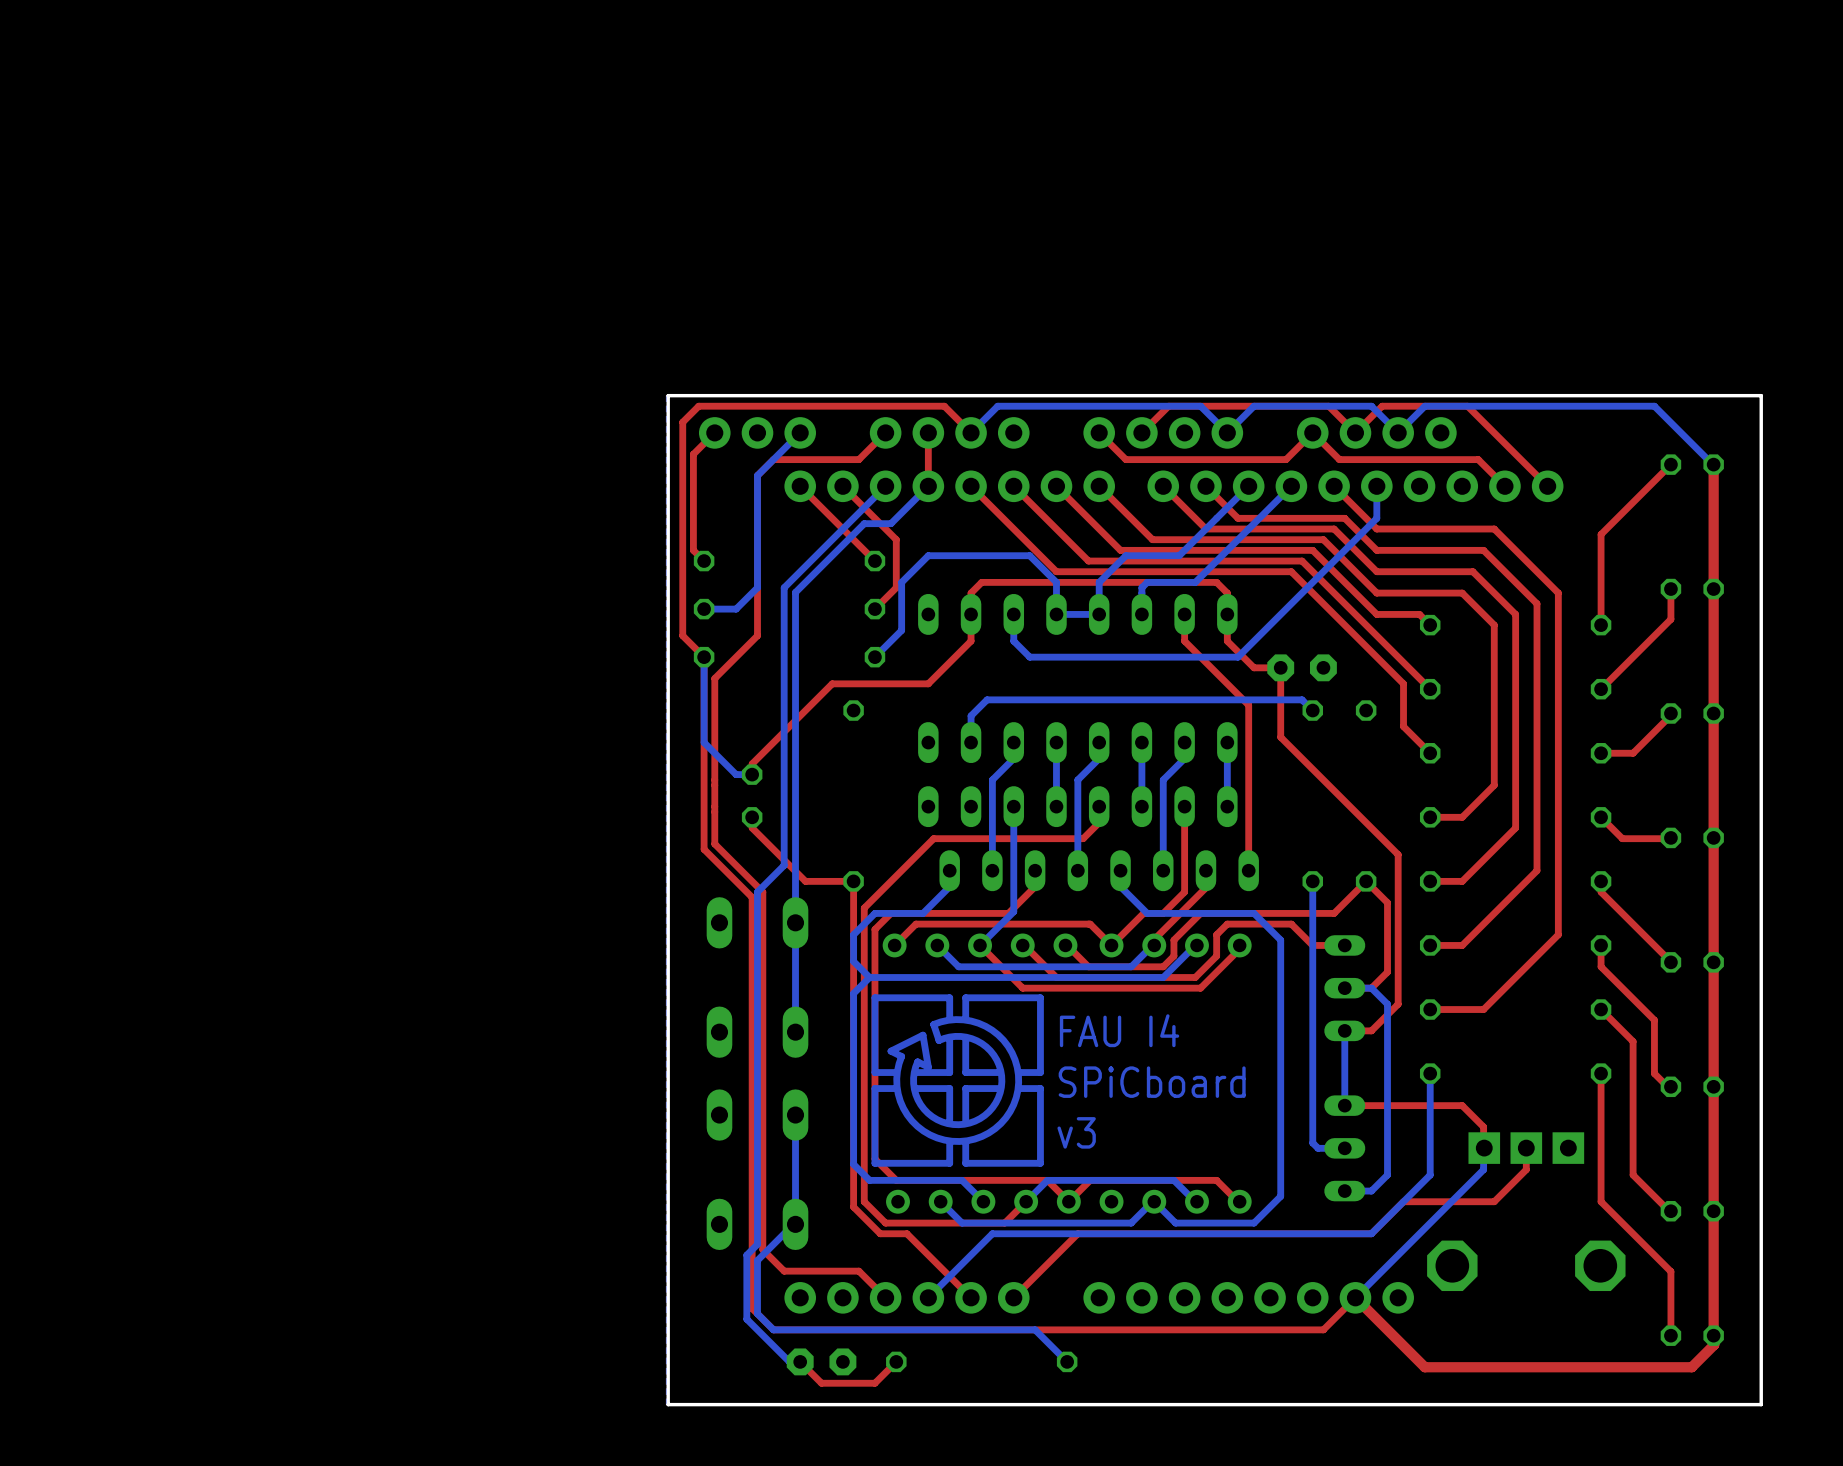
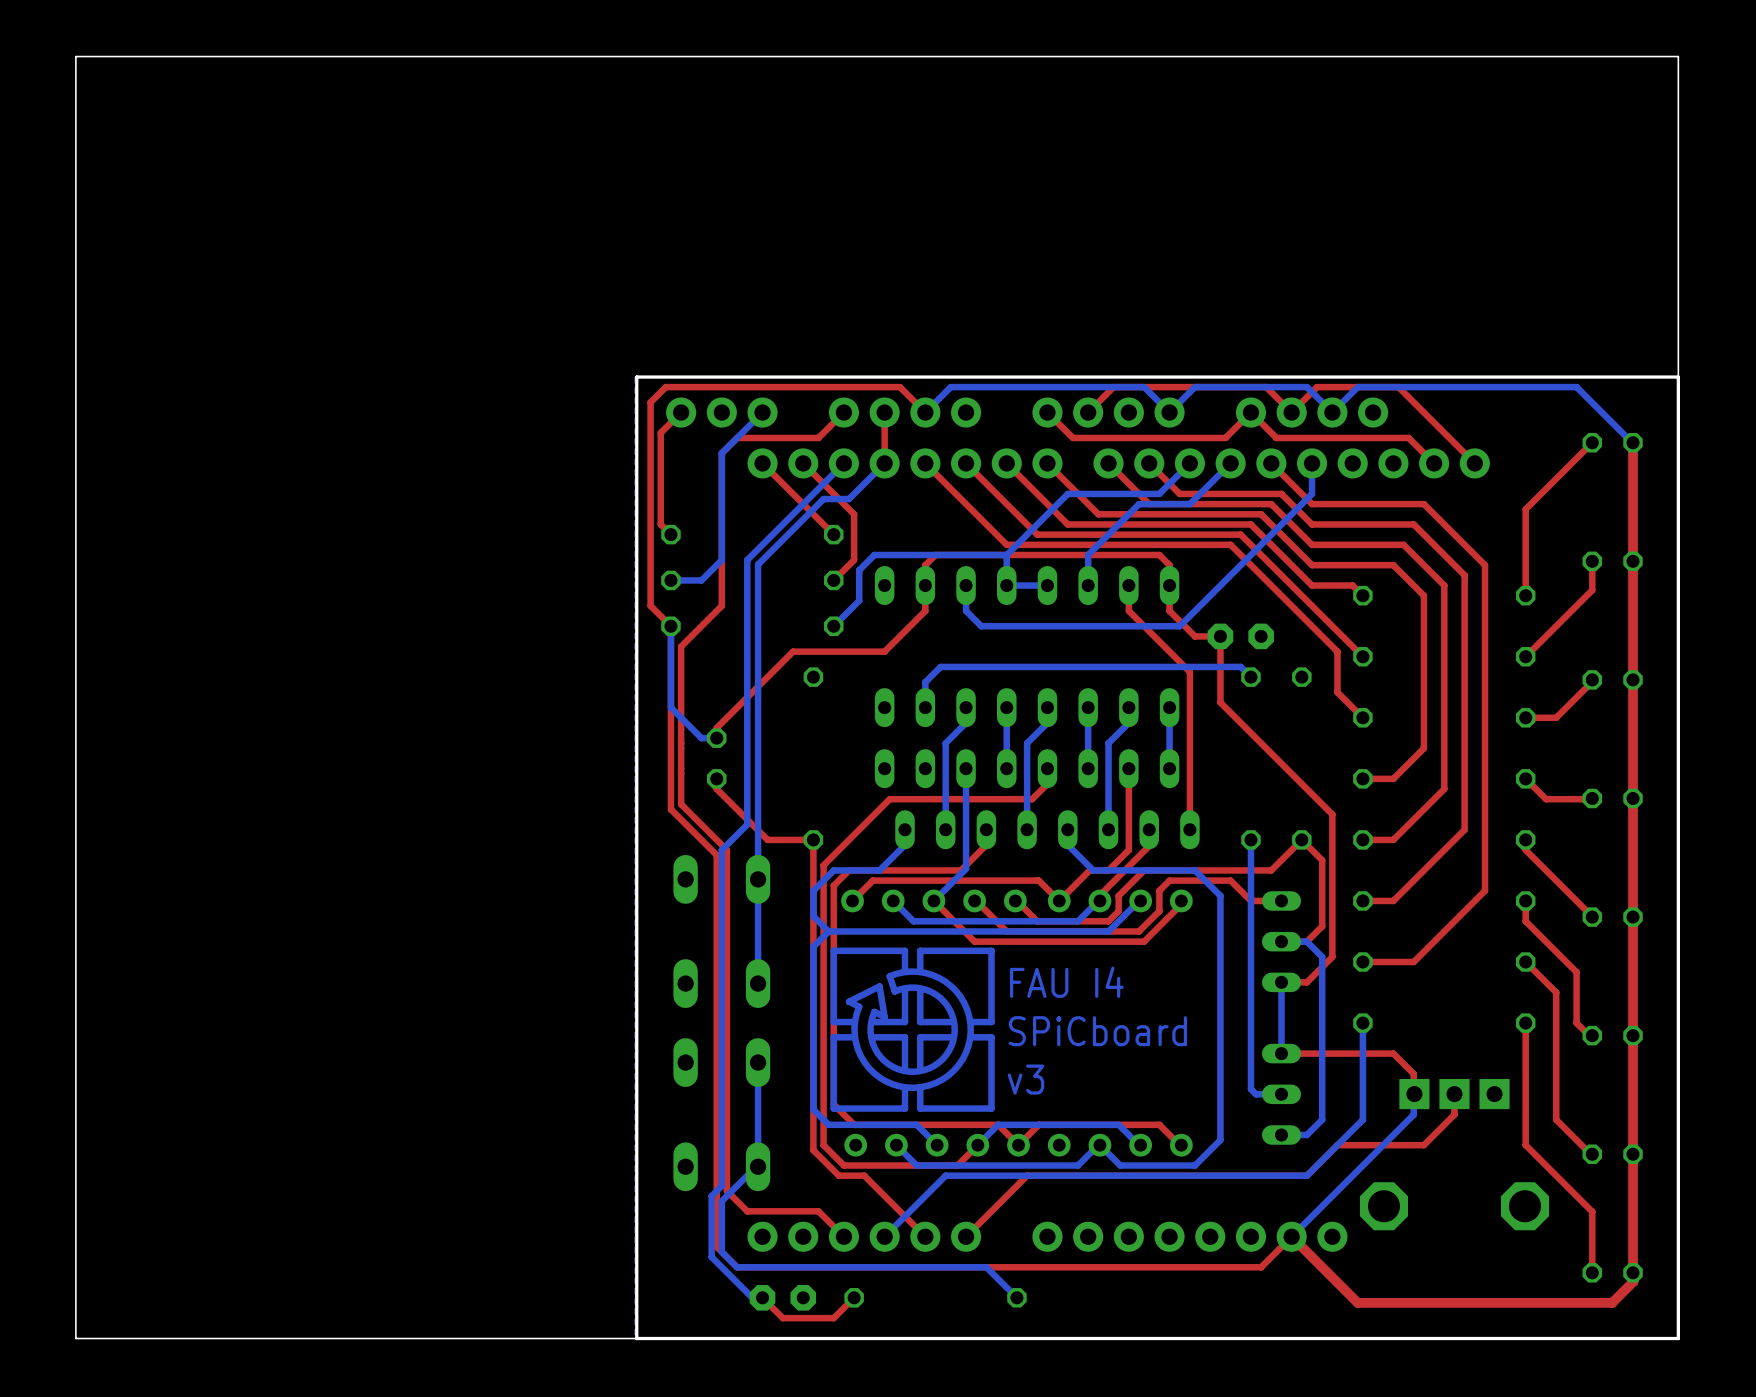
board edge: none -> (1678, 377) (1678, 56) (75, 56) (75, 1338) (636, 1338)
bottom track: (1216, 518) (1179, 555) (1125, 555) (1099, 582) (1099, 614) -> none
bottom track: (1248, 529) (1195, 582) (1147, 582) (1141, 587) -> (1189, 504) (1139, 504) (1088, 554) (1088, 560)
bottom track: (1056, 582) (1029, 555) (928, 555) (901, 582) (901, 598) -> (1159, 493) (1067, 493) (1006, 554) (874, 554) (859, 570)

